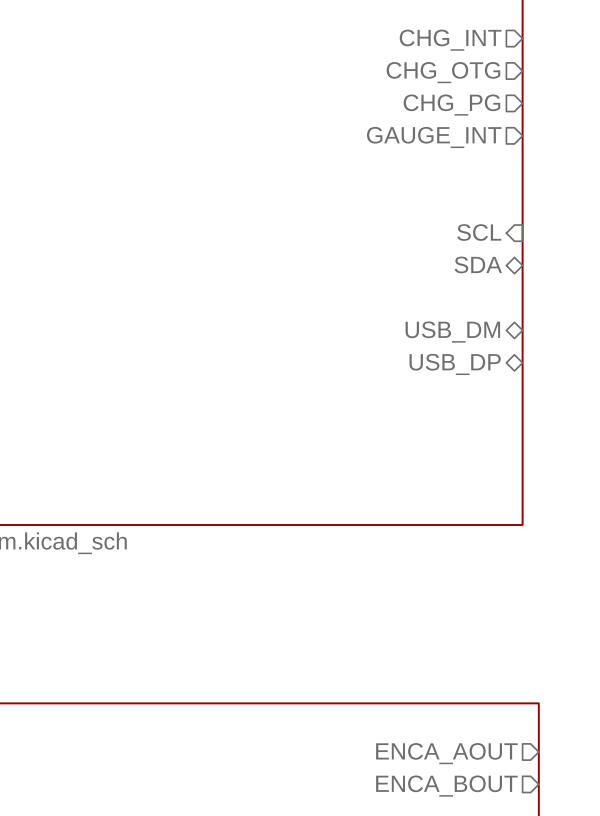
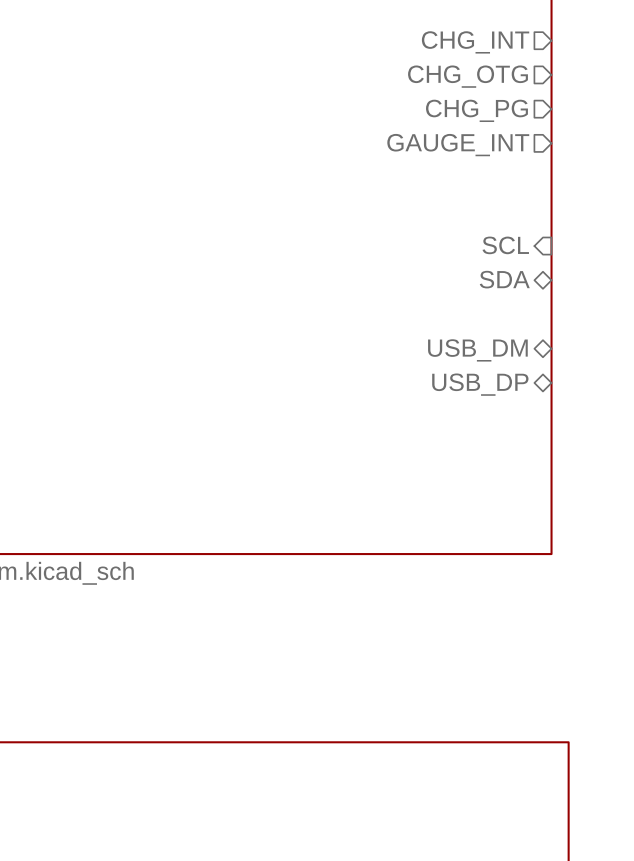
sheet pin: ENCA_AOUT (446, 753) -> none
sheet pin: ENCA_BOUT (446, 786) -> none

